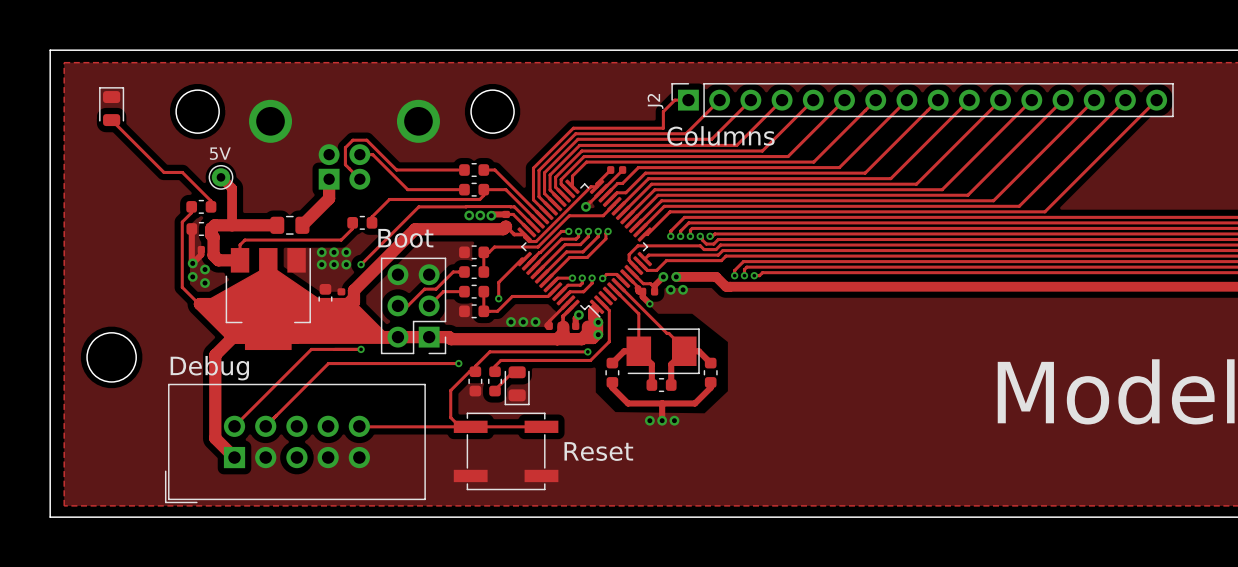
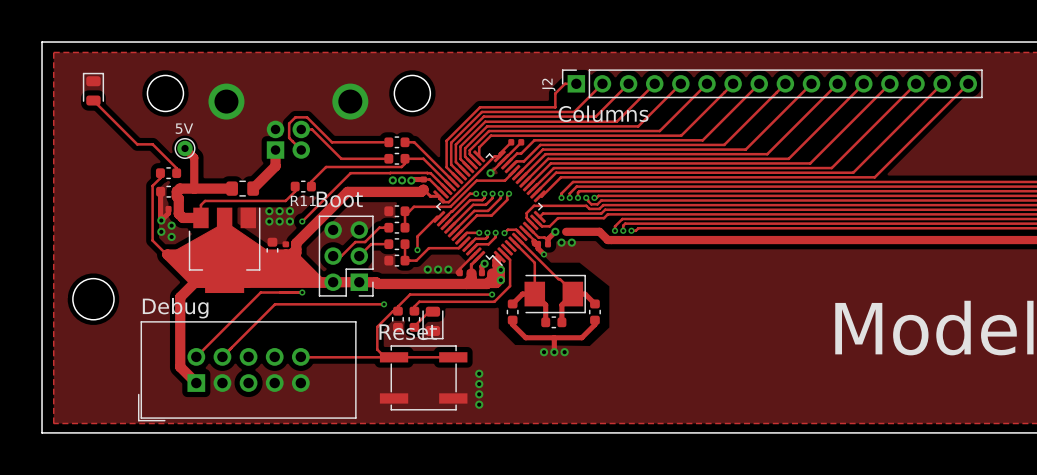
R11 name: none -> R11 (303, 200)
via: (676, 276) -> none
via: none -> (479, 373)
text position: Reset (598, 451) -> Reset (408, 332)
via: none -> (479, 384)
via: none -> (479, 394)
via: none -> (479, 404)

